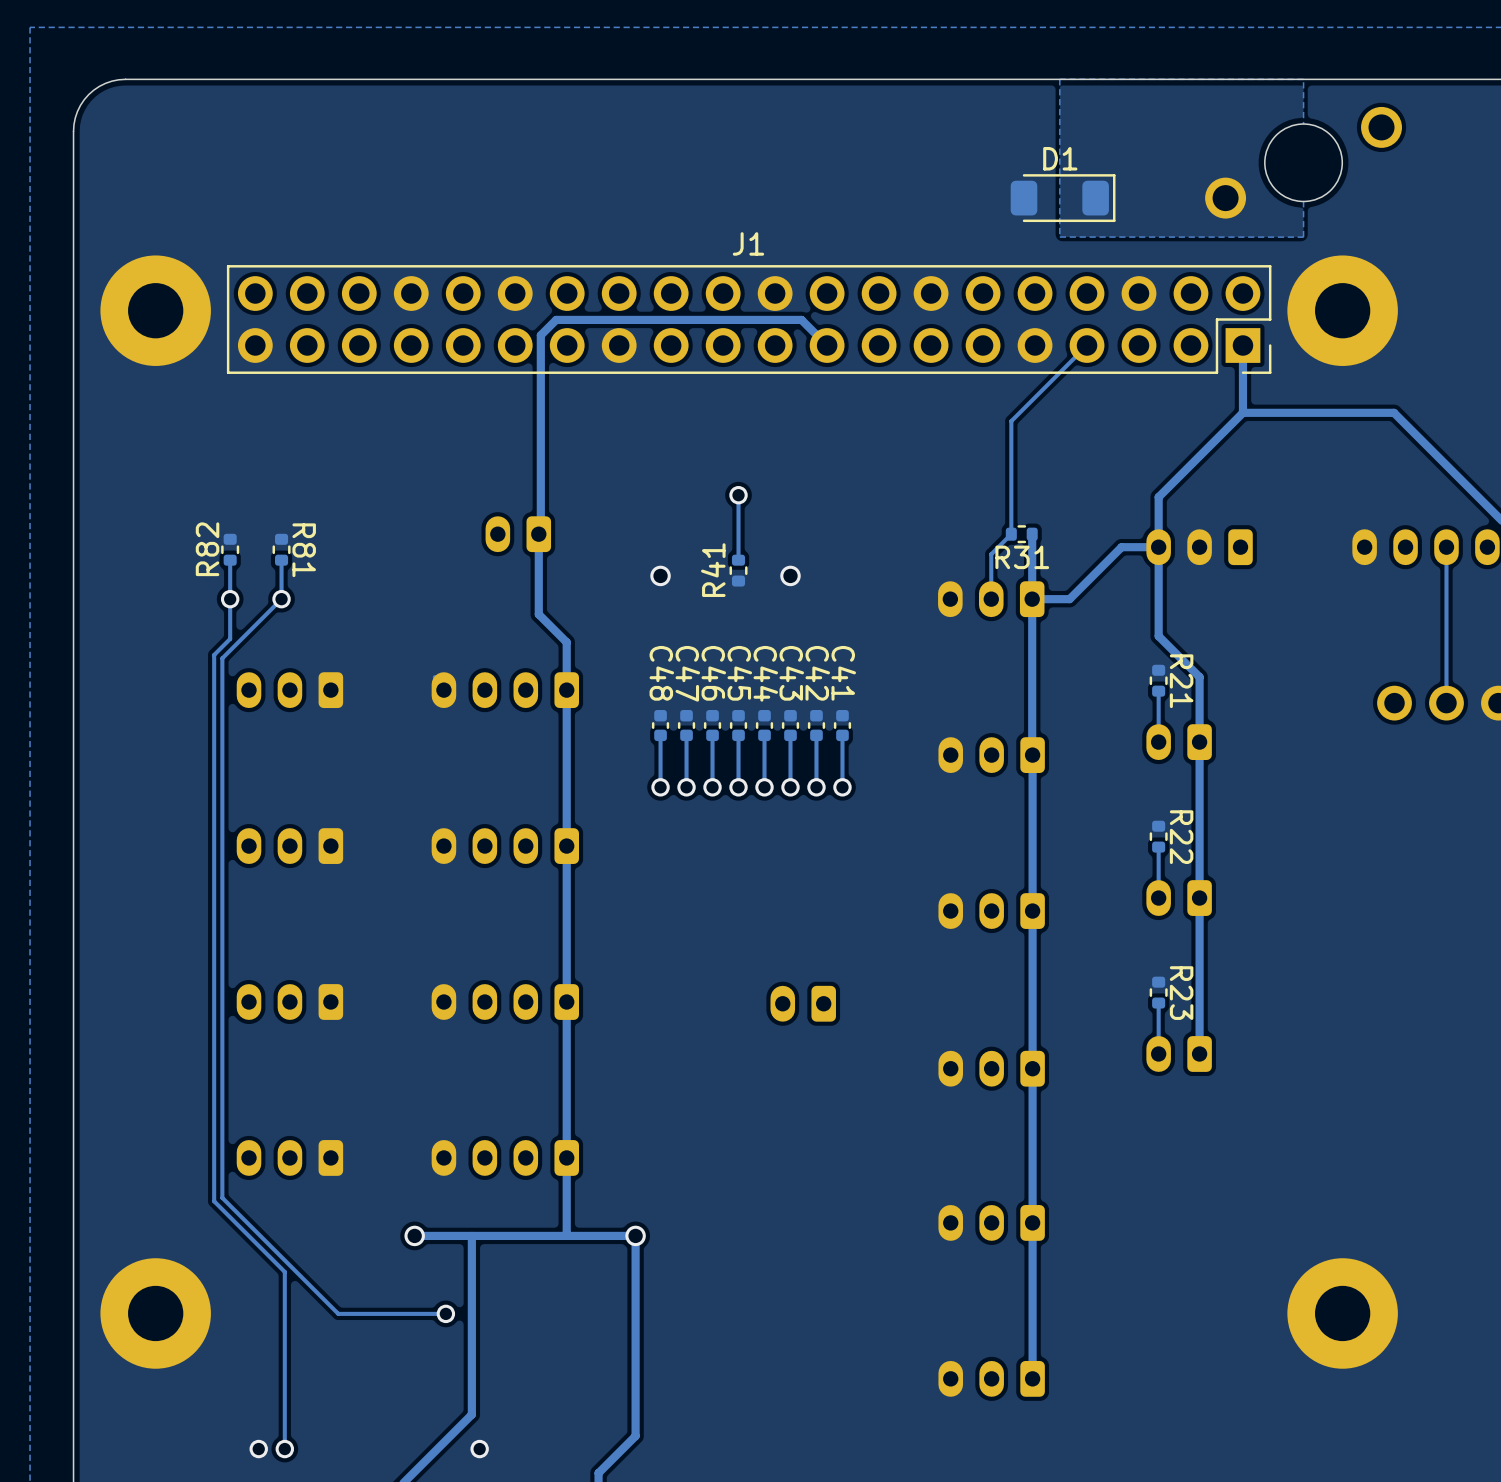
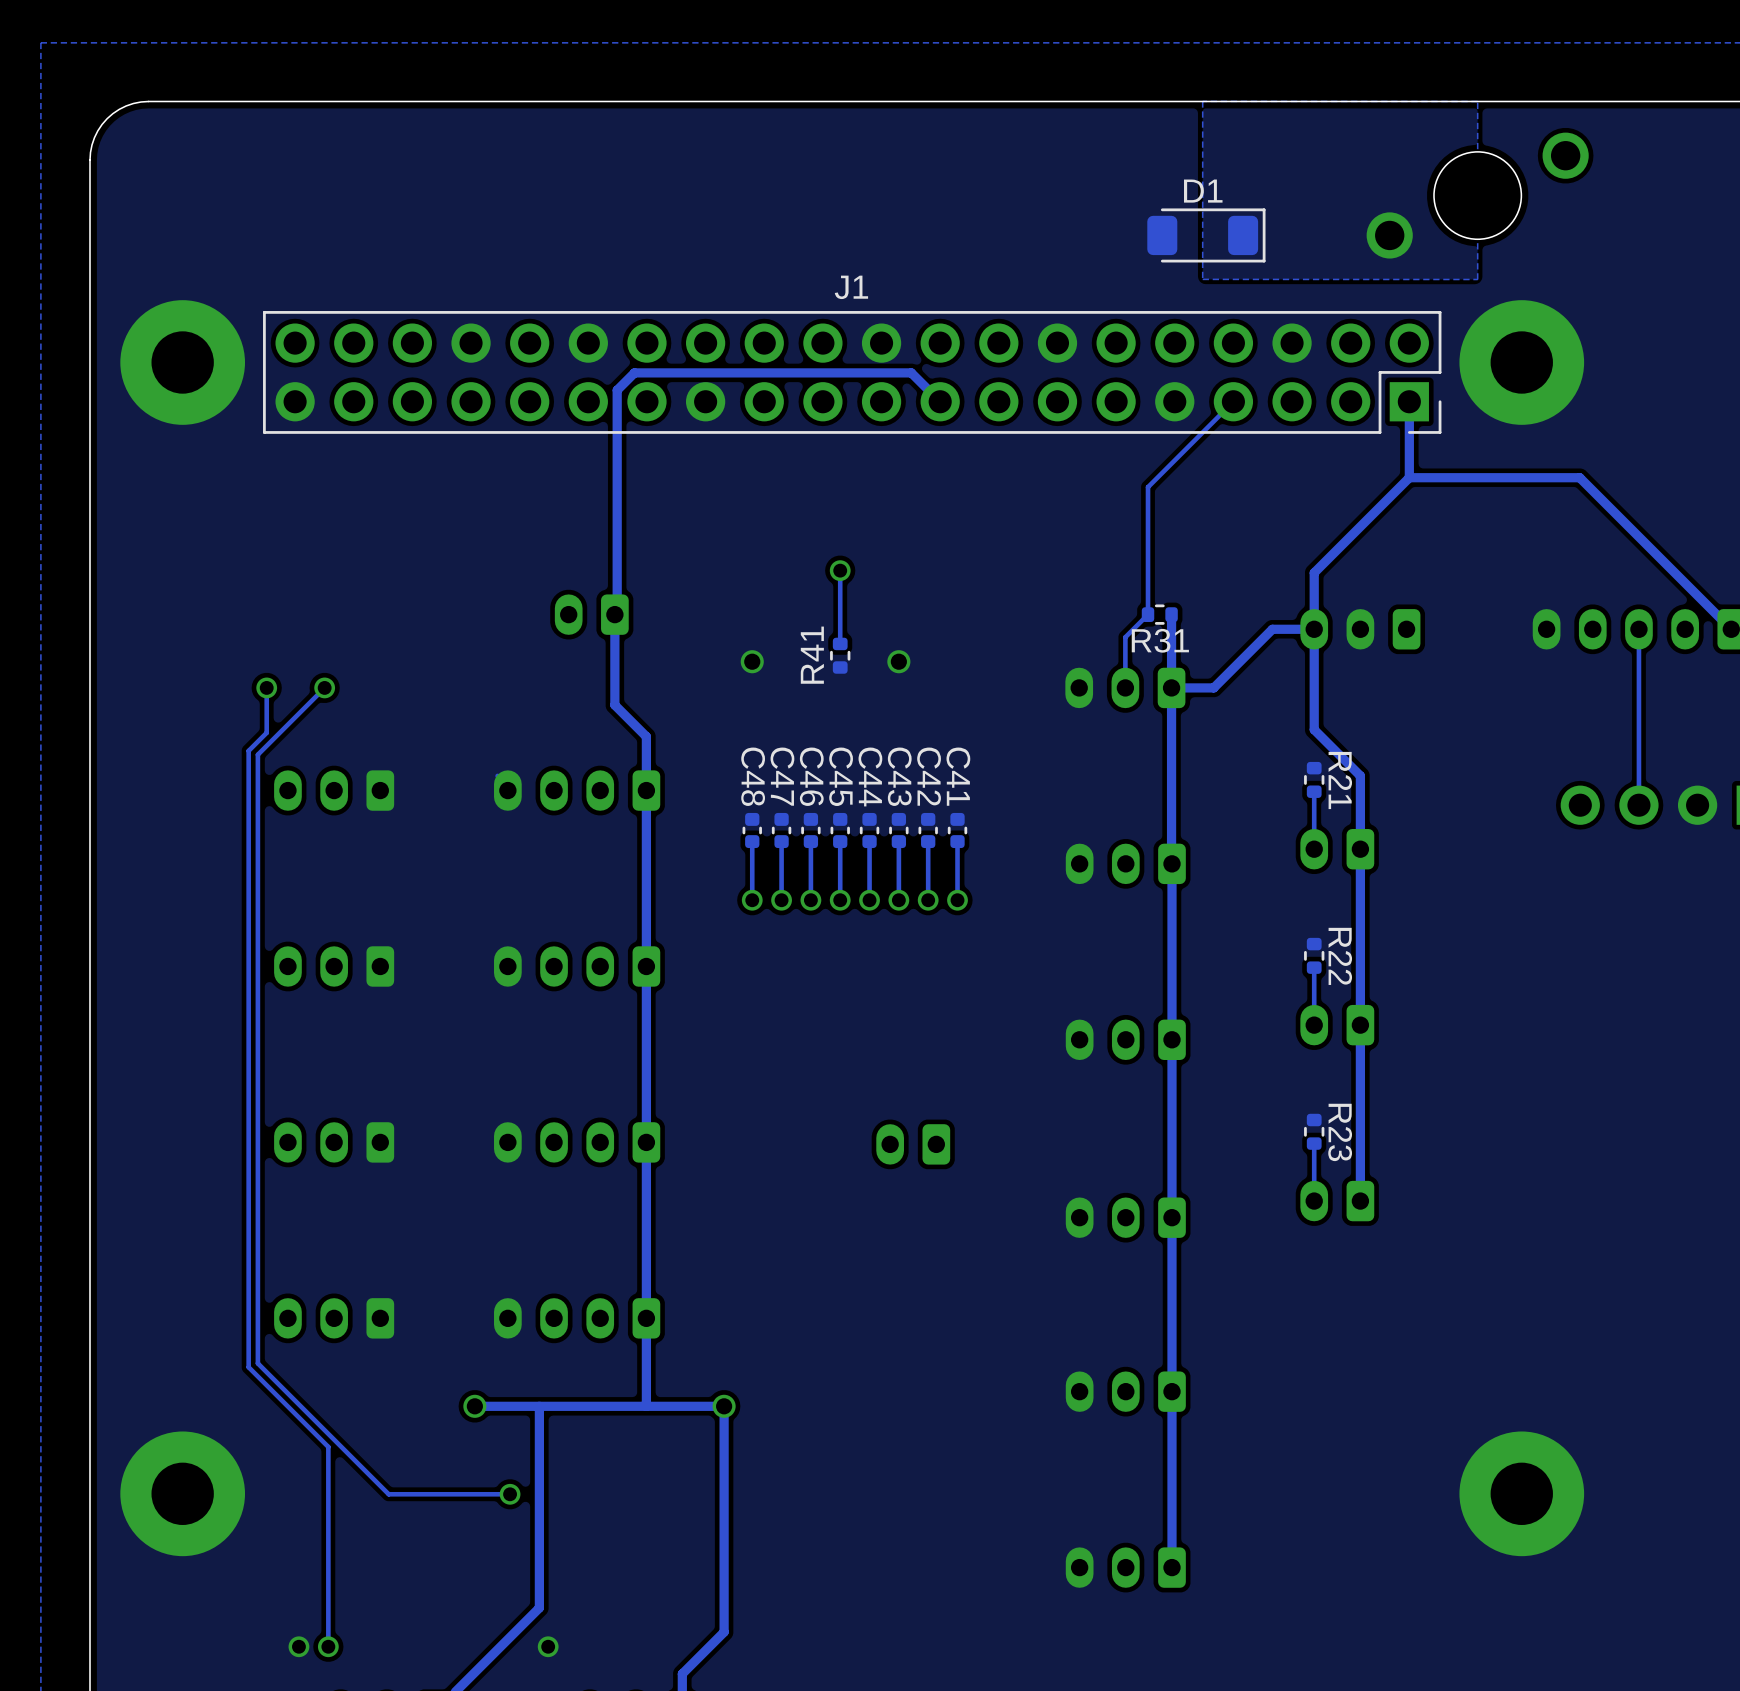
R82: (230, 549) -> none
R81: (281, 549) -> none
track: (230, 560) (230, 599) -> none
track: (281, 560) (281, 599) -> none

